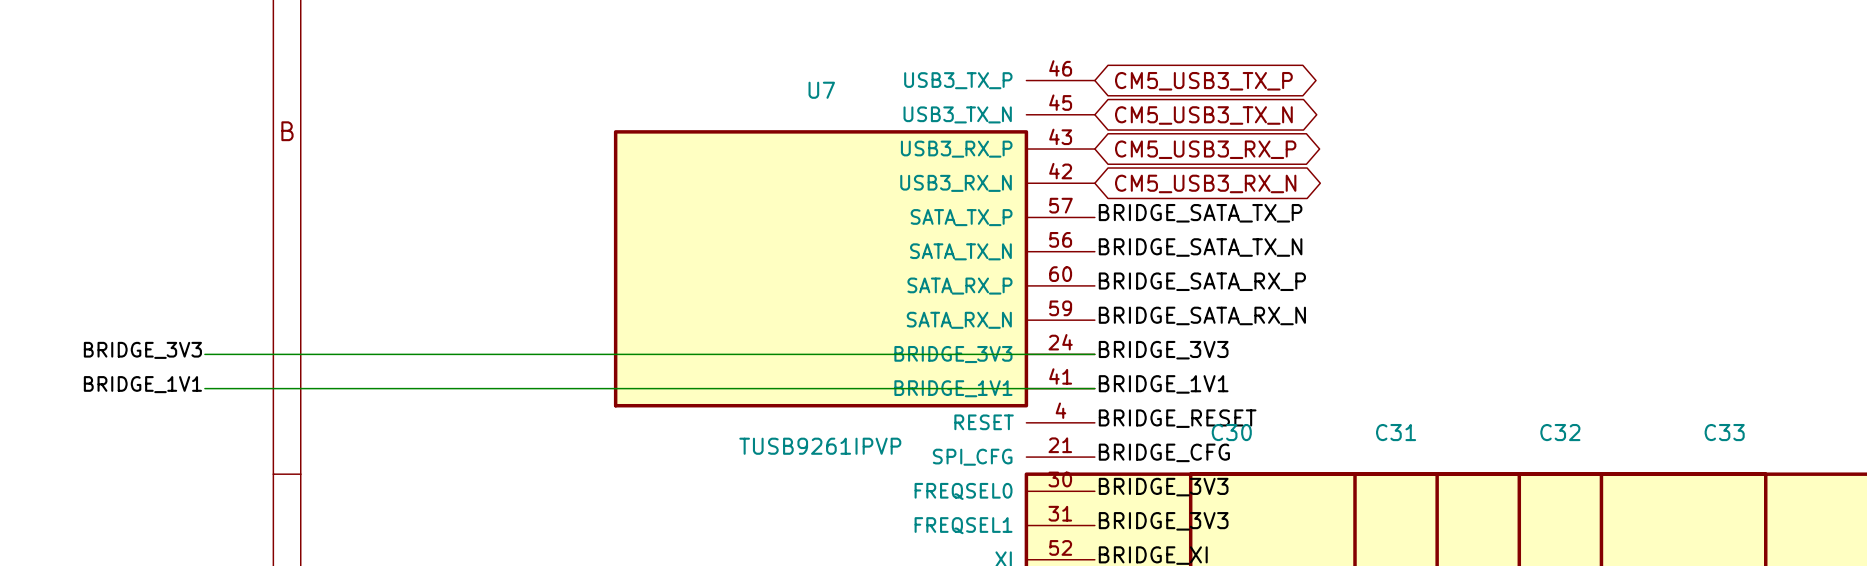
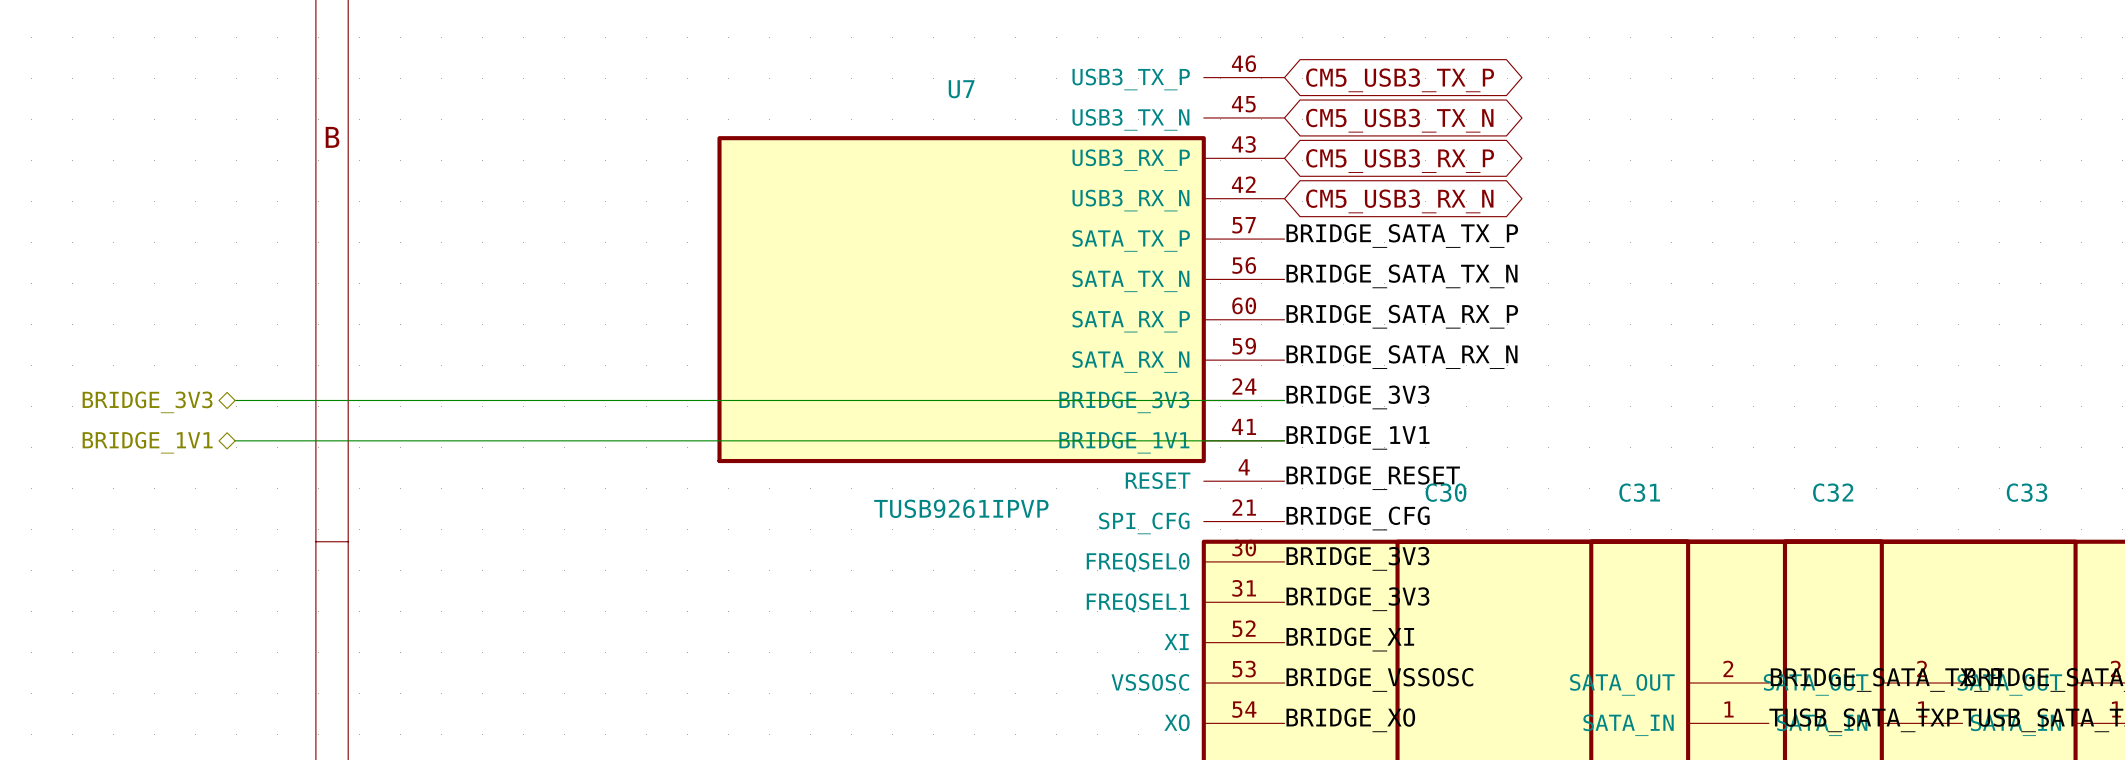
label: BRIDGE_3V3 (142, 350) -> none
hierarchical label: none -> BRIDGE_3V3 (147, 402)
label: BRIDGE_1V1 (142, 384) -> none
hierarchical label: none -> BRIDGE_1V1 (147, 442)

